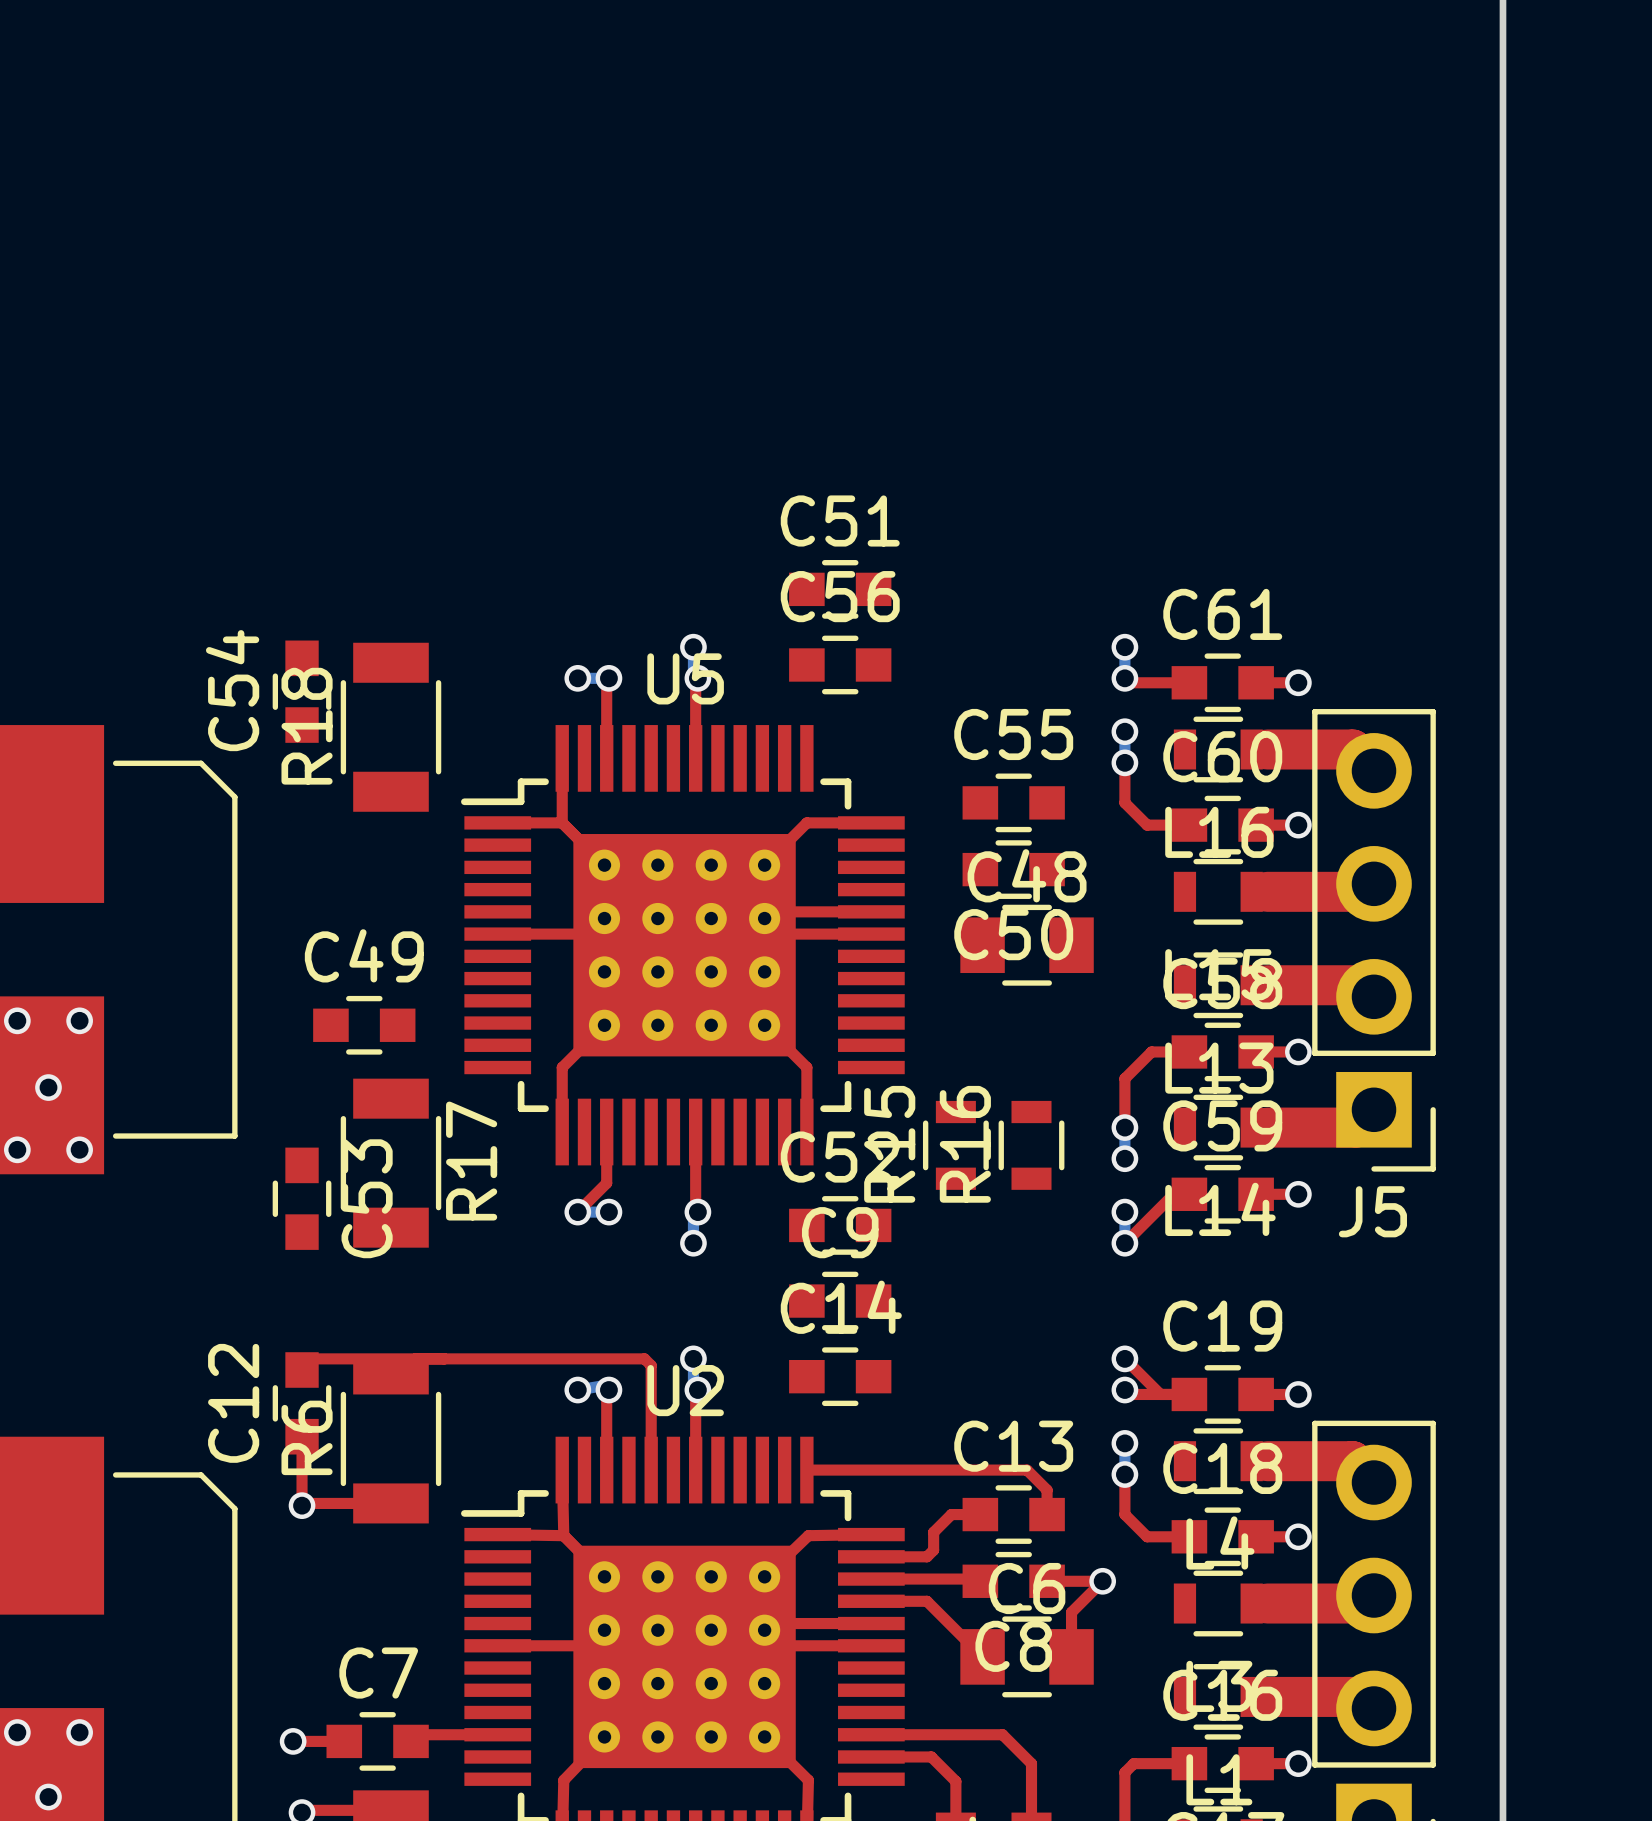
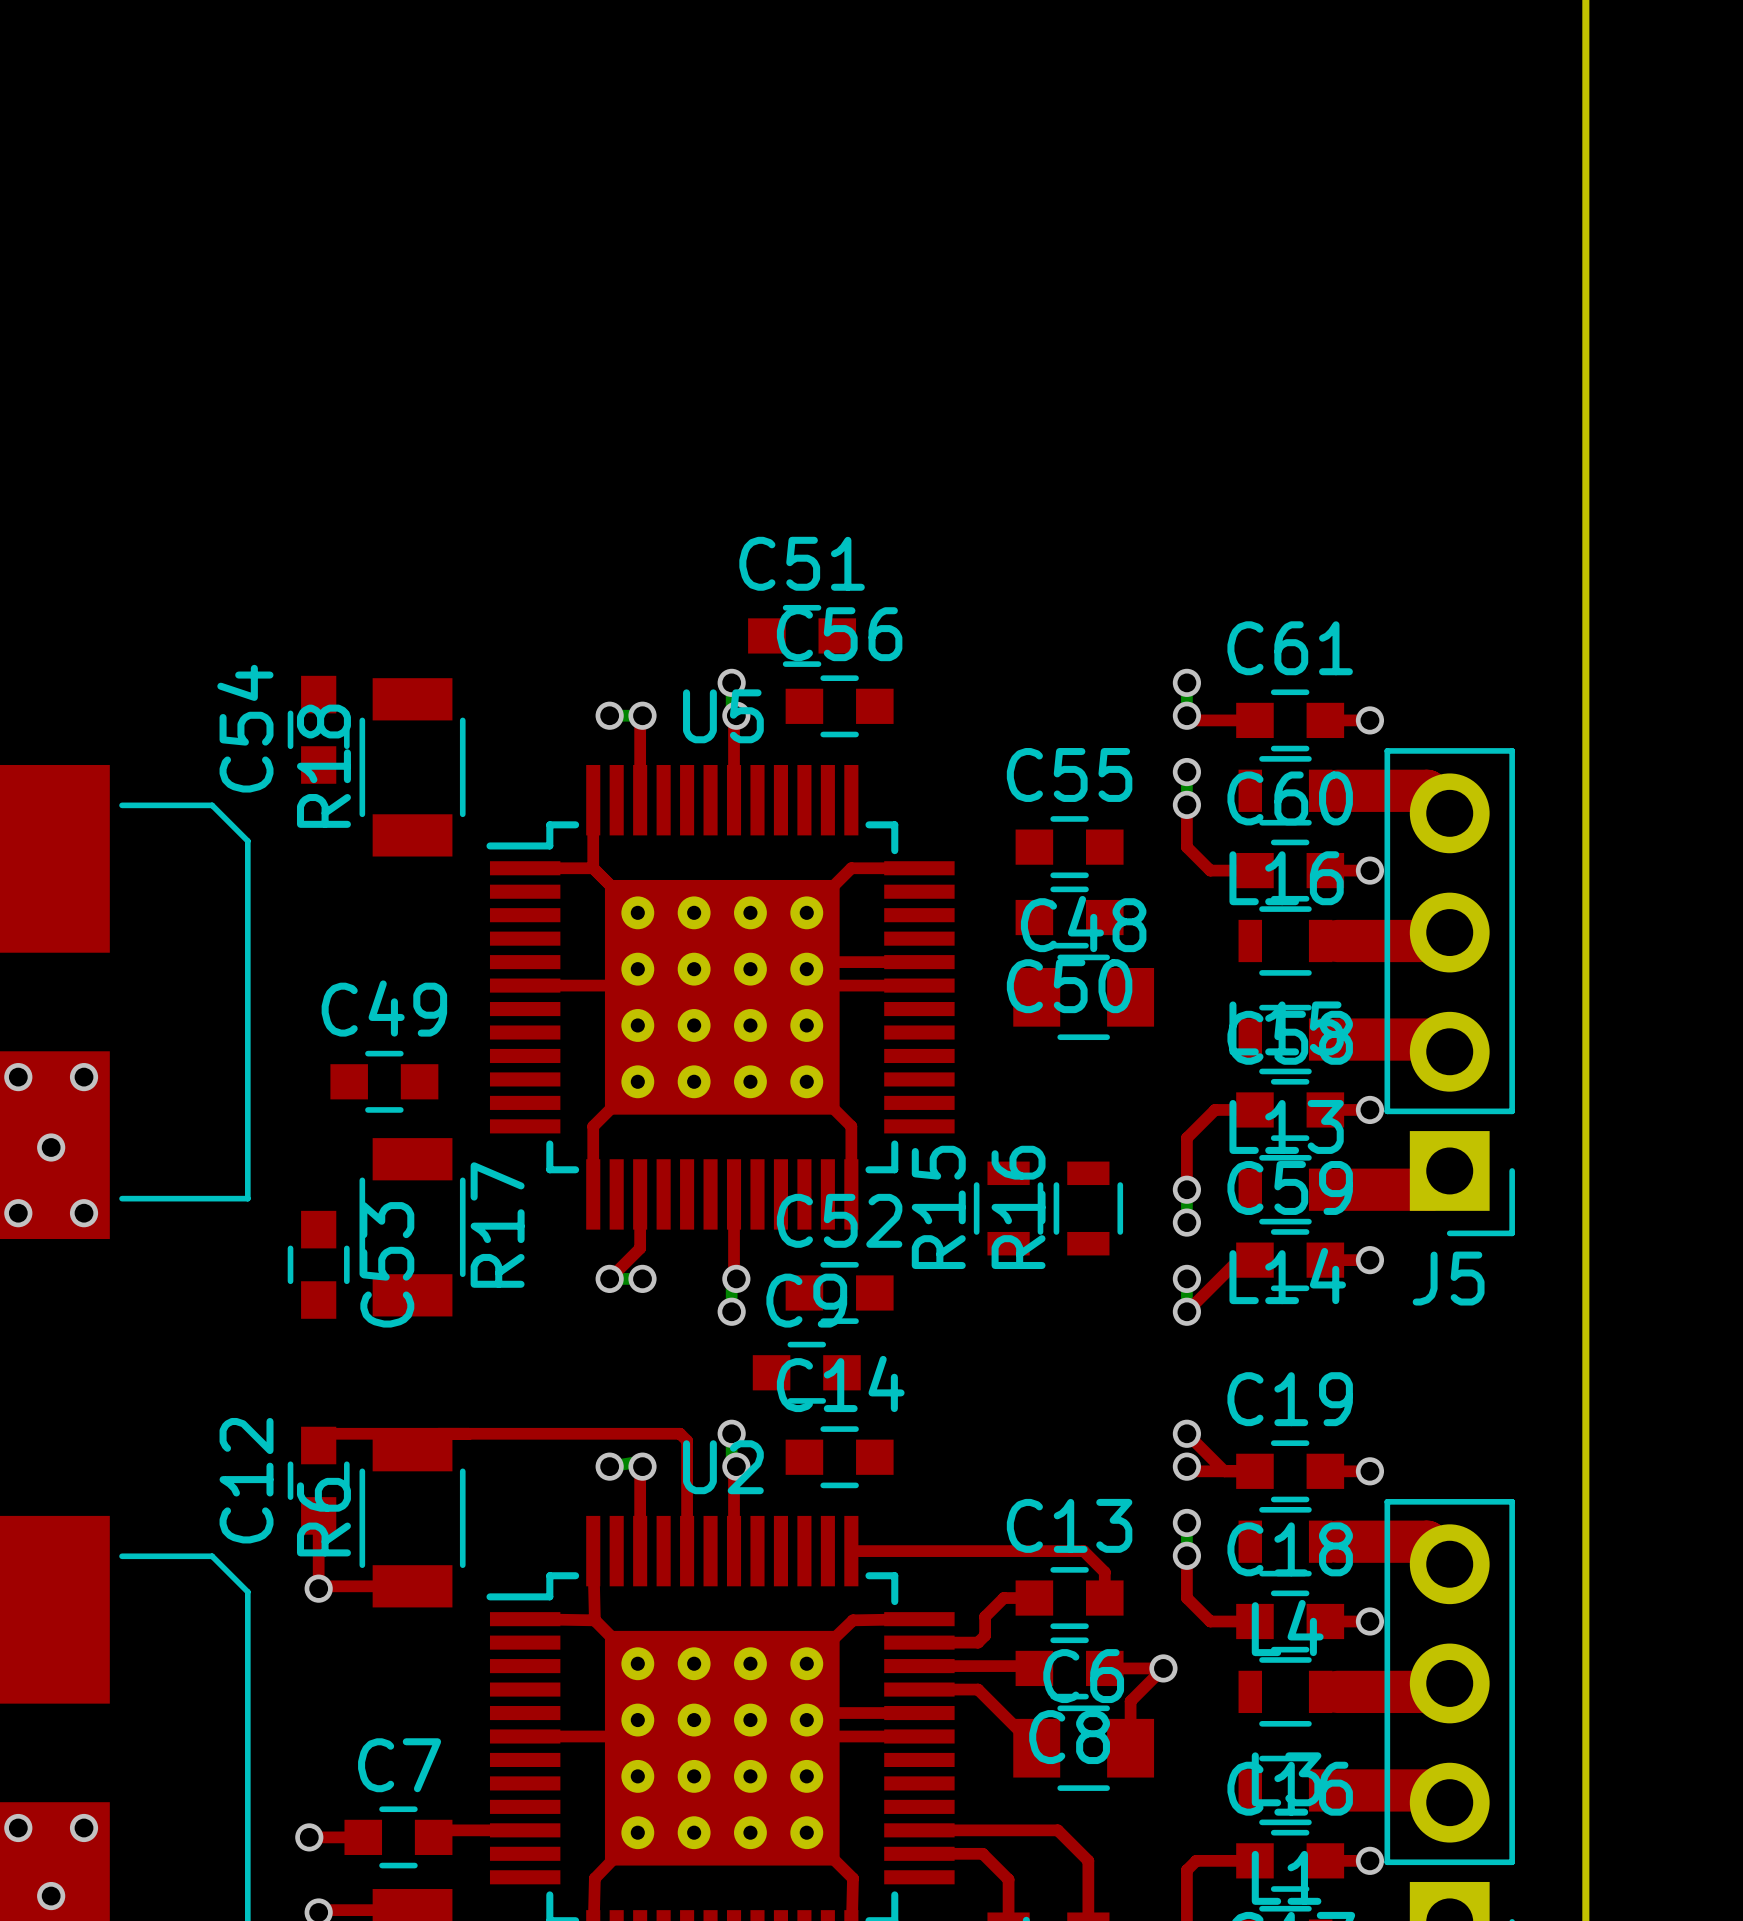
C51 position: (840, 589) -> (802, 635)
C56 position: (840, 664) -> (839, 706)
C52 position: (840, 1225) -> (839, 1292)
C9 position: (840, 1301) -> (806, 1372)
C14 position: (840, 1376) -> (839, 1457)

